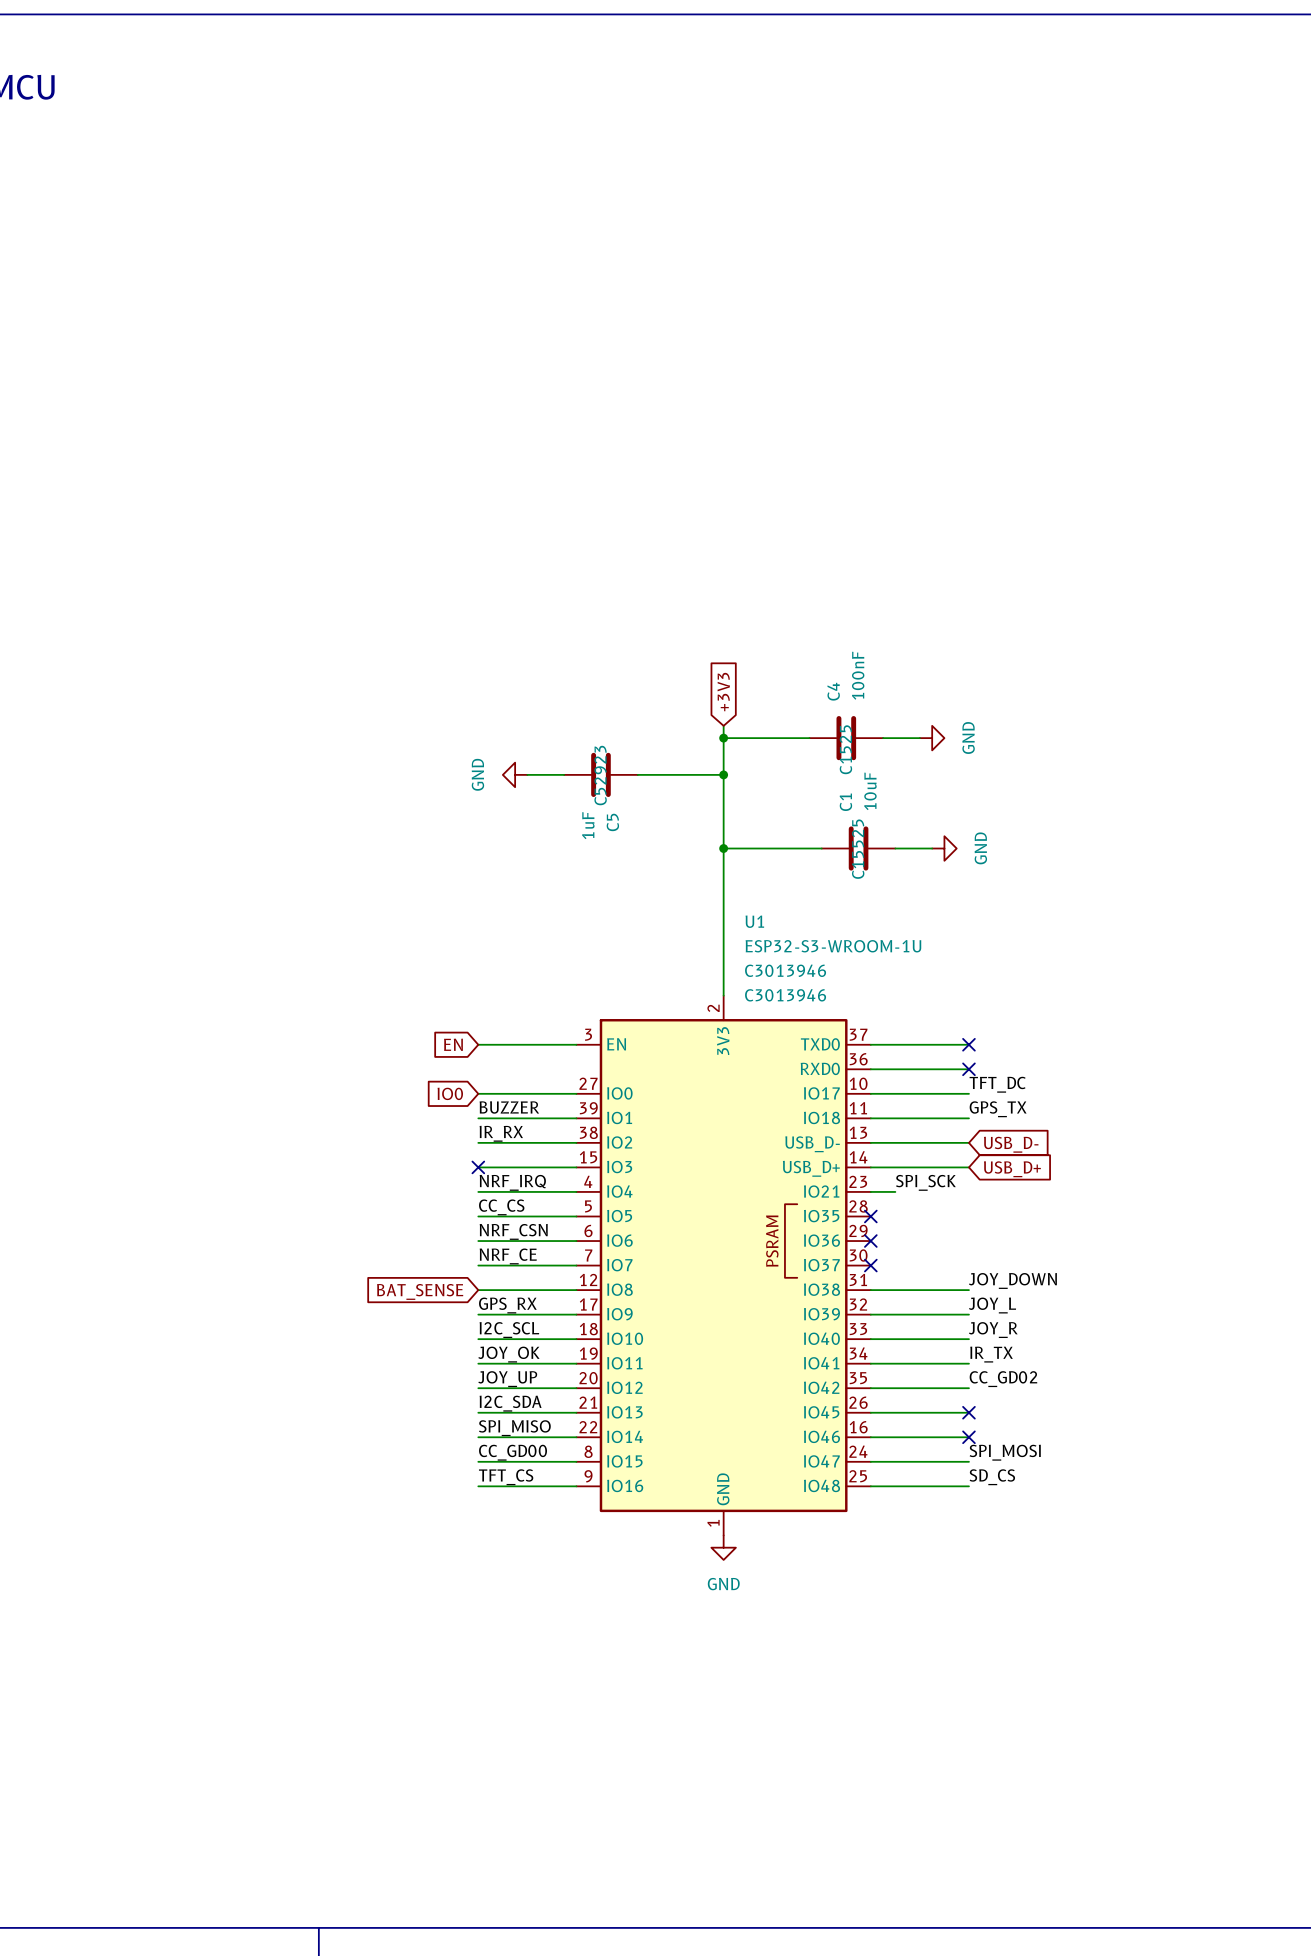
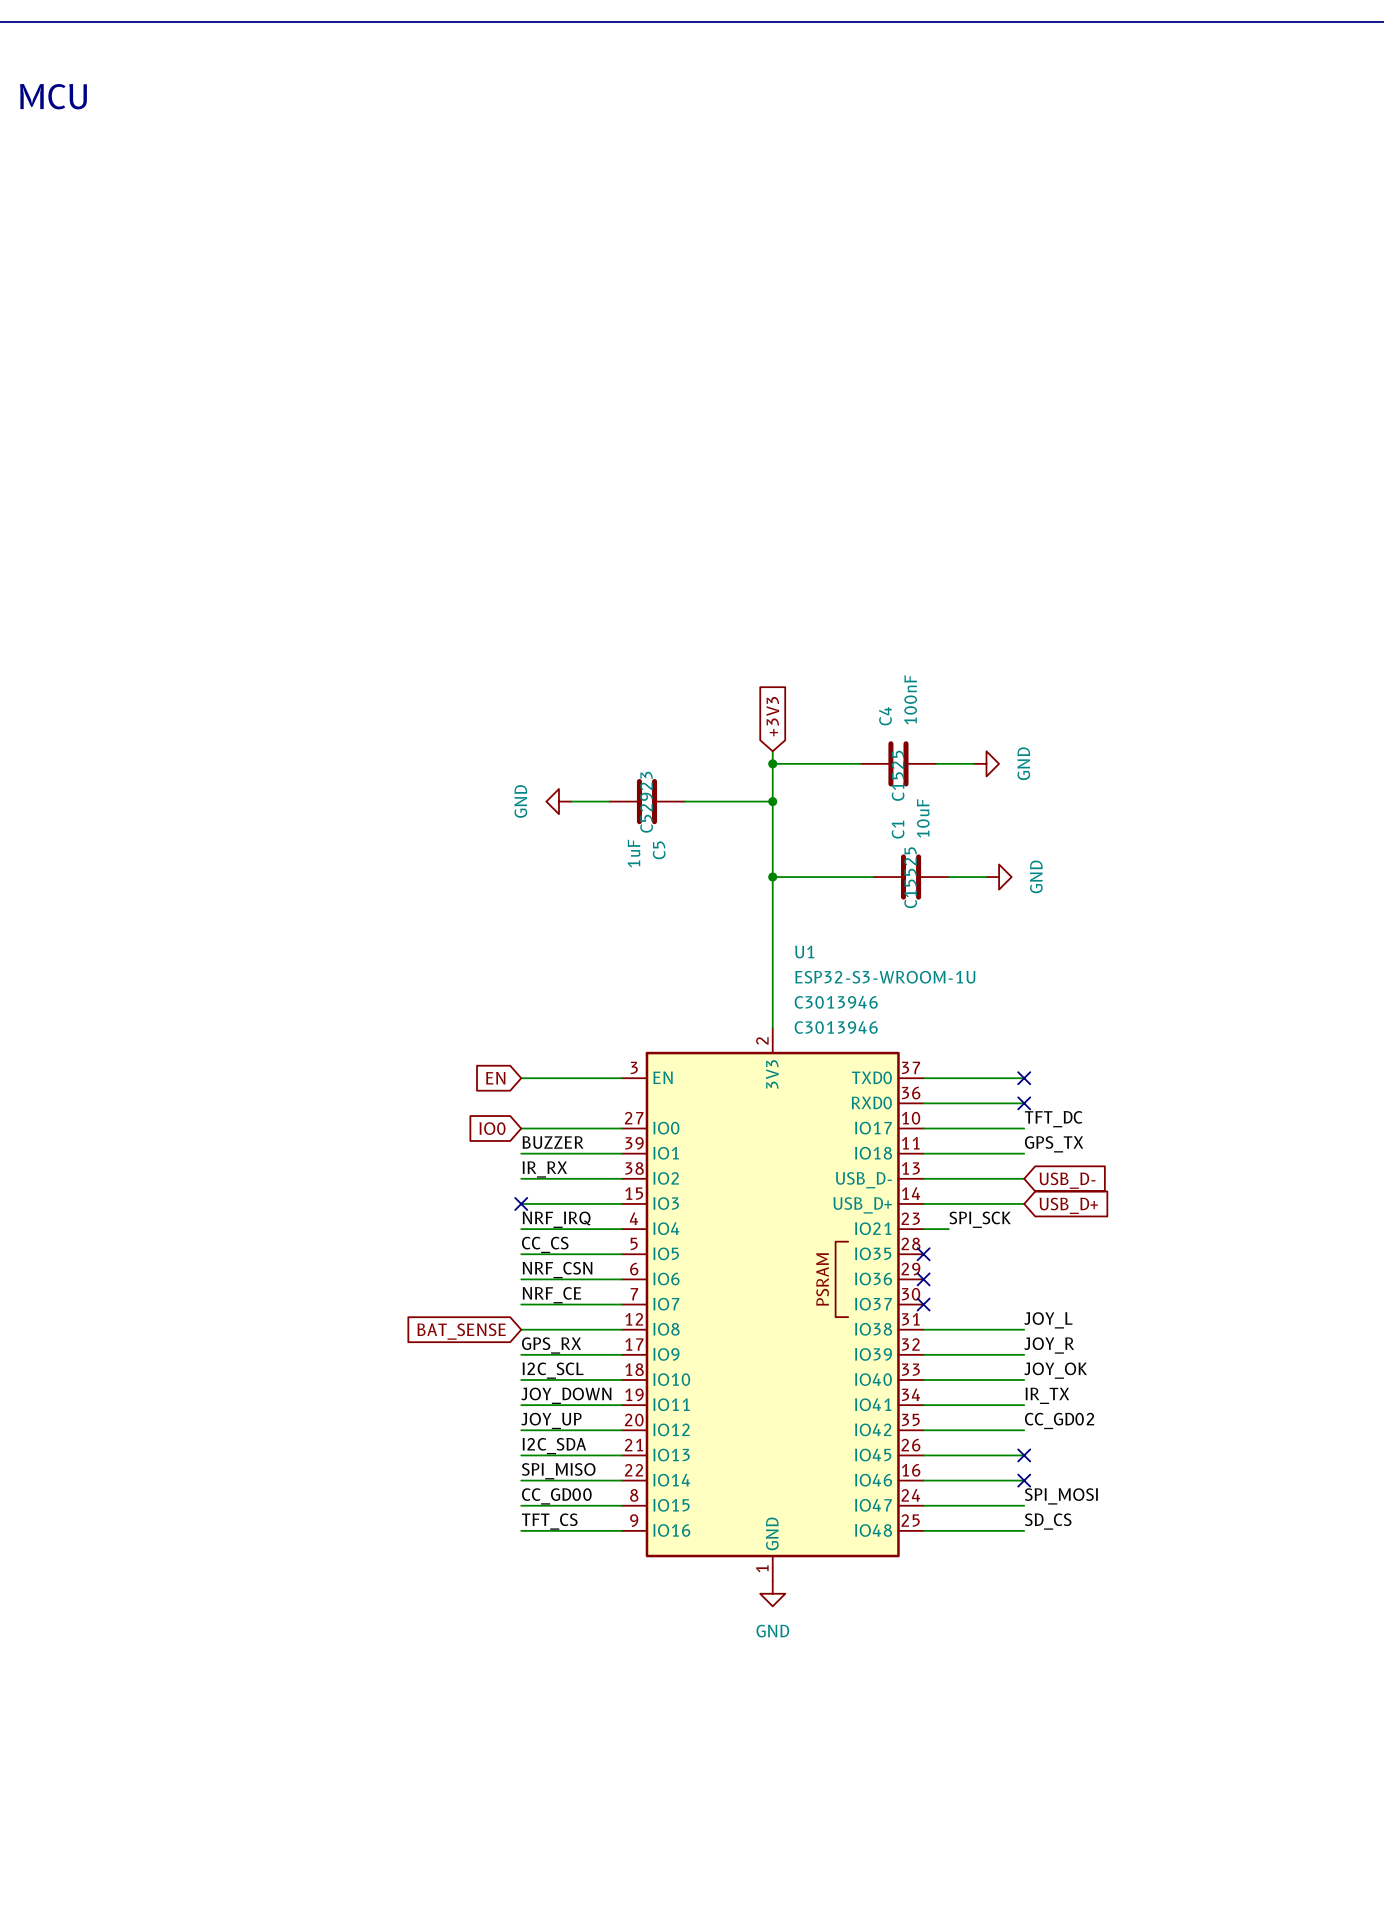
label: JOY_DOWN (1012, 1280) -> JOY_L (1048, 1320)
label: JOY_L (992, 1305) -> JOY_R (1049, 1345)
label: JOY_R (993, 1330) -> JOY_OK (1055, 1370)
label: JOY_OK (508, 1354) -> JOY_DOWN (566, 1395)

